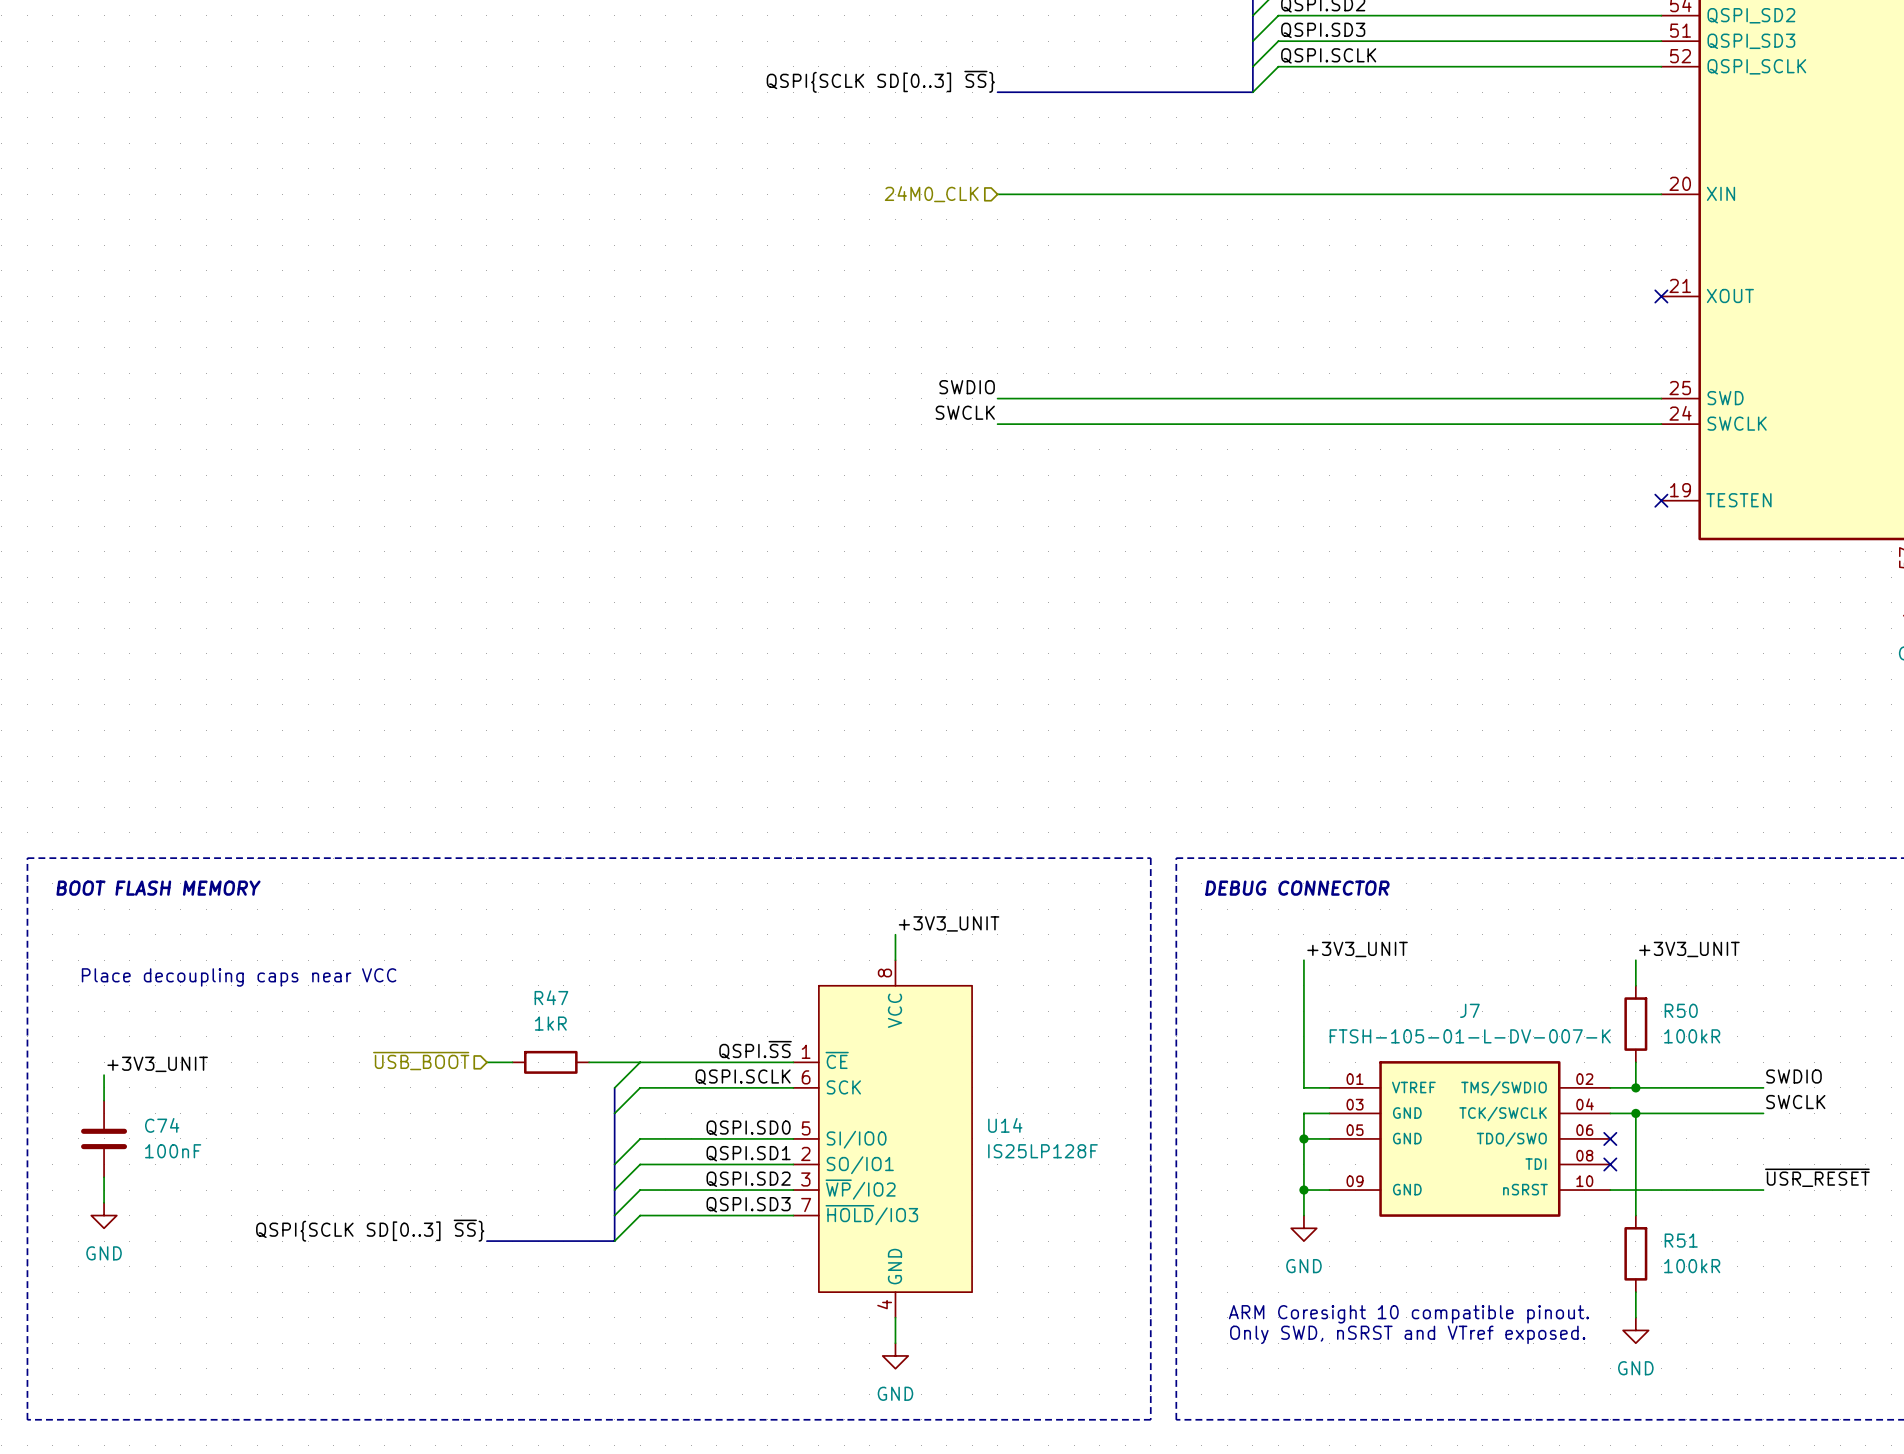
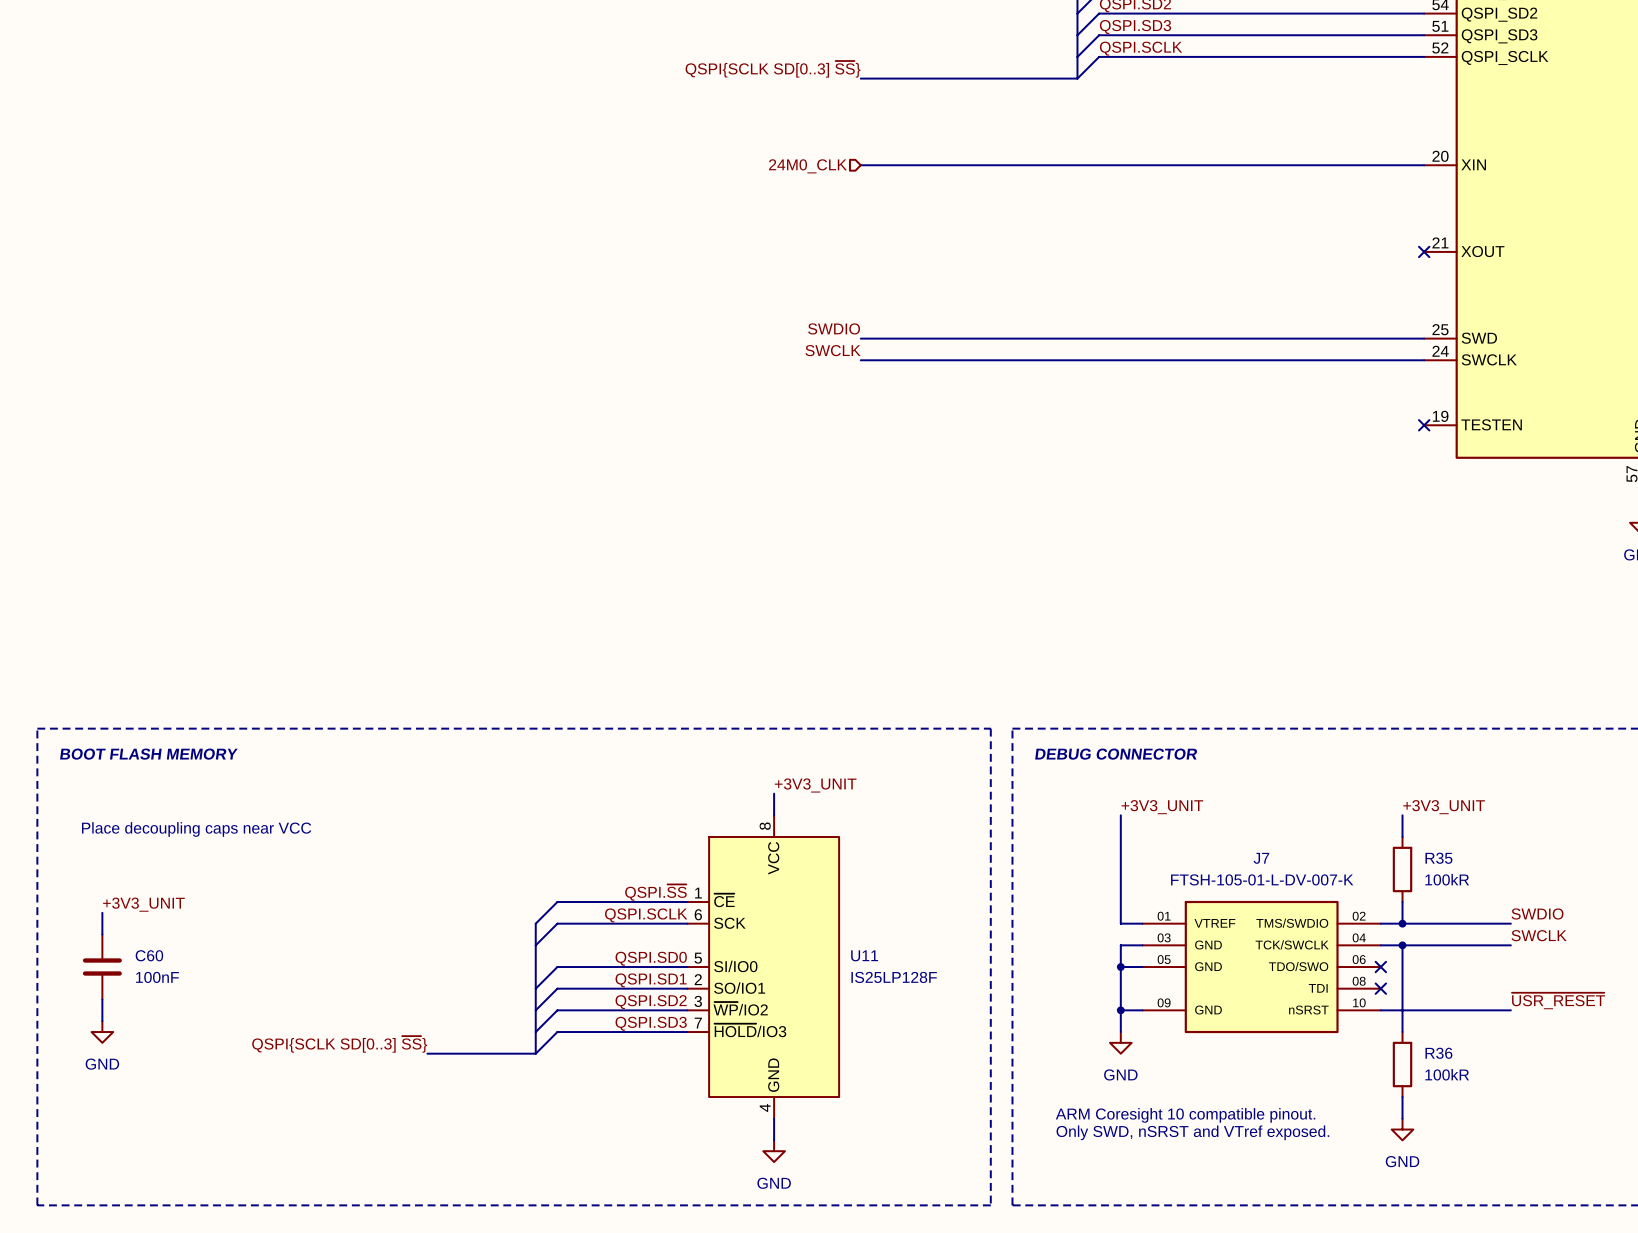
R50 name: R50 (1681, 1010) -> R35 (1438, 858)
hierarchical label: ~{USB_BOOT} (421, 1061) -> none
wire: (486, 1062) (512, 1062) -> none
R47: 1kR (550, 1062) -> none
wire: (589, 1062) (640, 1062) -> none
C74 name: C74 (162, 1125) -> C60 (149, 955)
U14 name: U14 (1005, 1125) -> U11 (864, 955)
R51 name: R51 (1681, 1240) -> R36 (1438, 1053)

